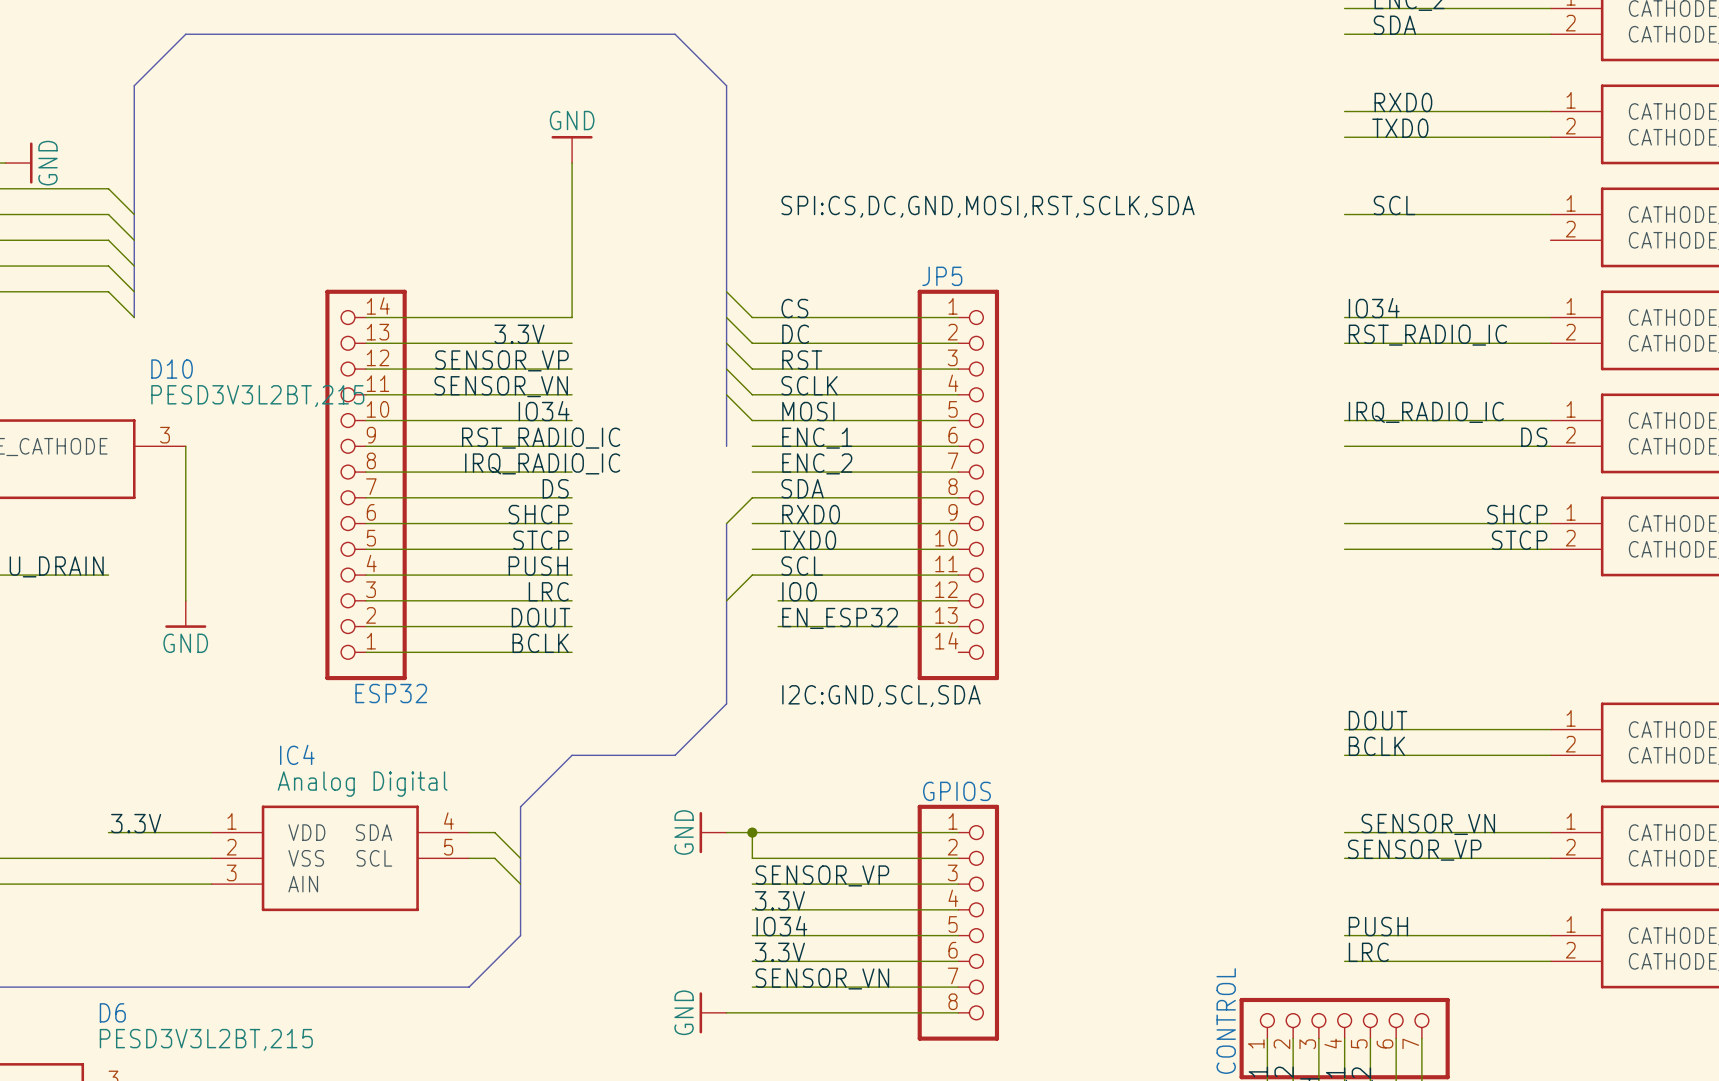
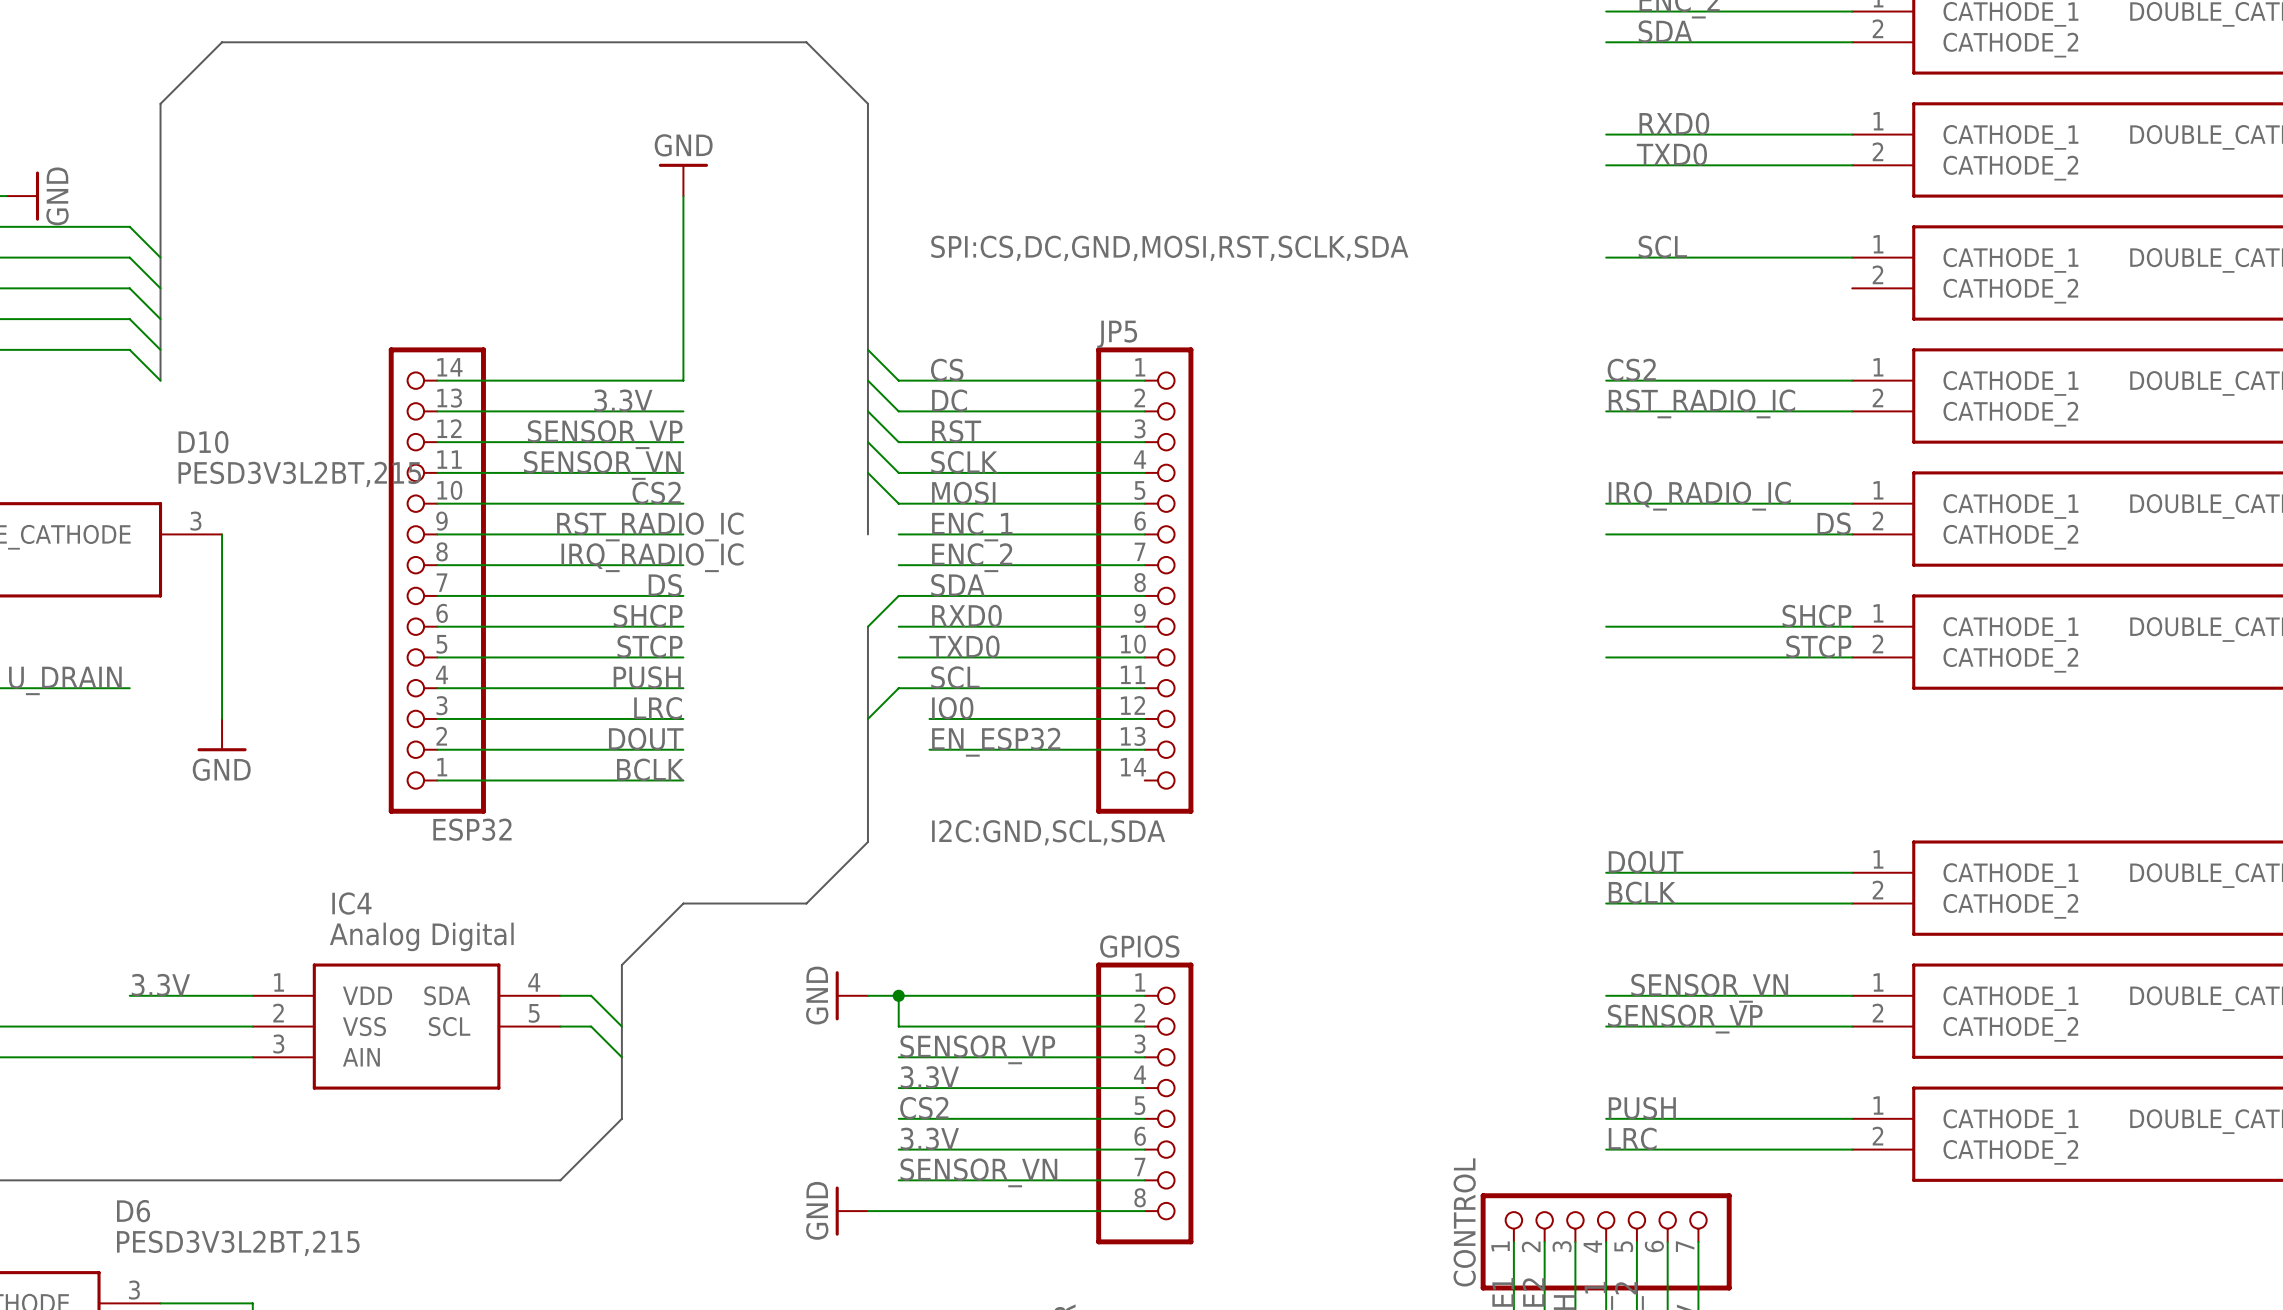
label: IO34 (1374, 308) -> CS2 (1631, 369)
label: IO34 (544, 411) -> CS2 (656, 492)
label: IO34 (781, 926) -> CS2 (924, 1108)

